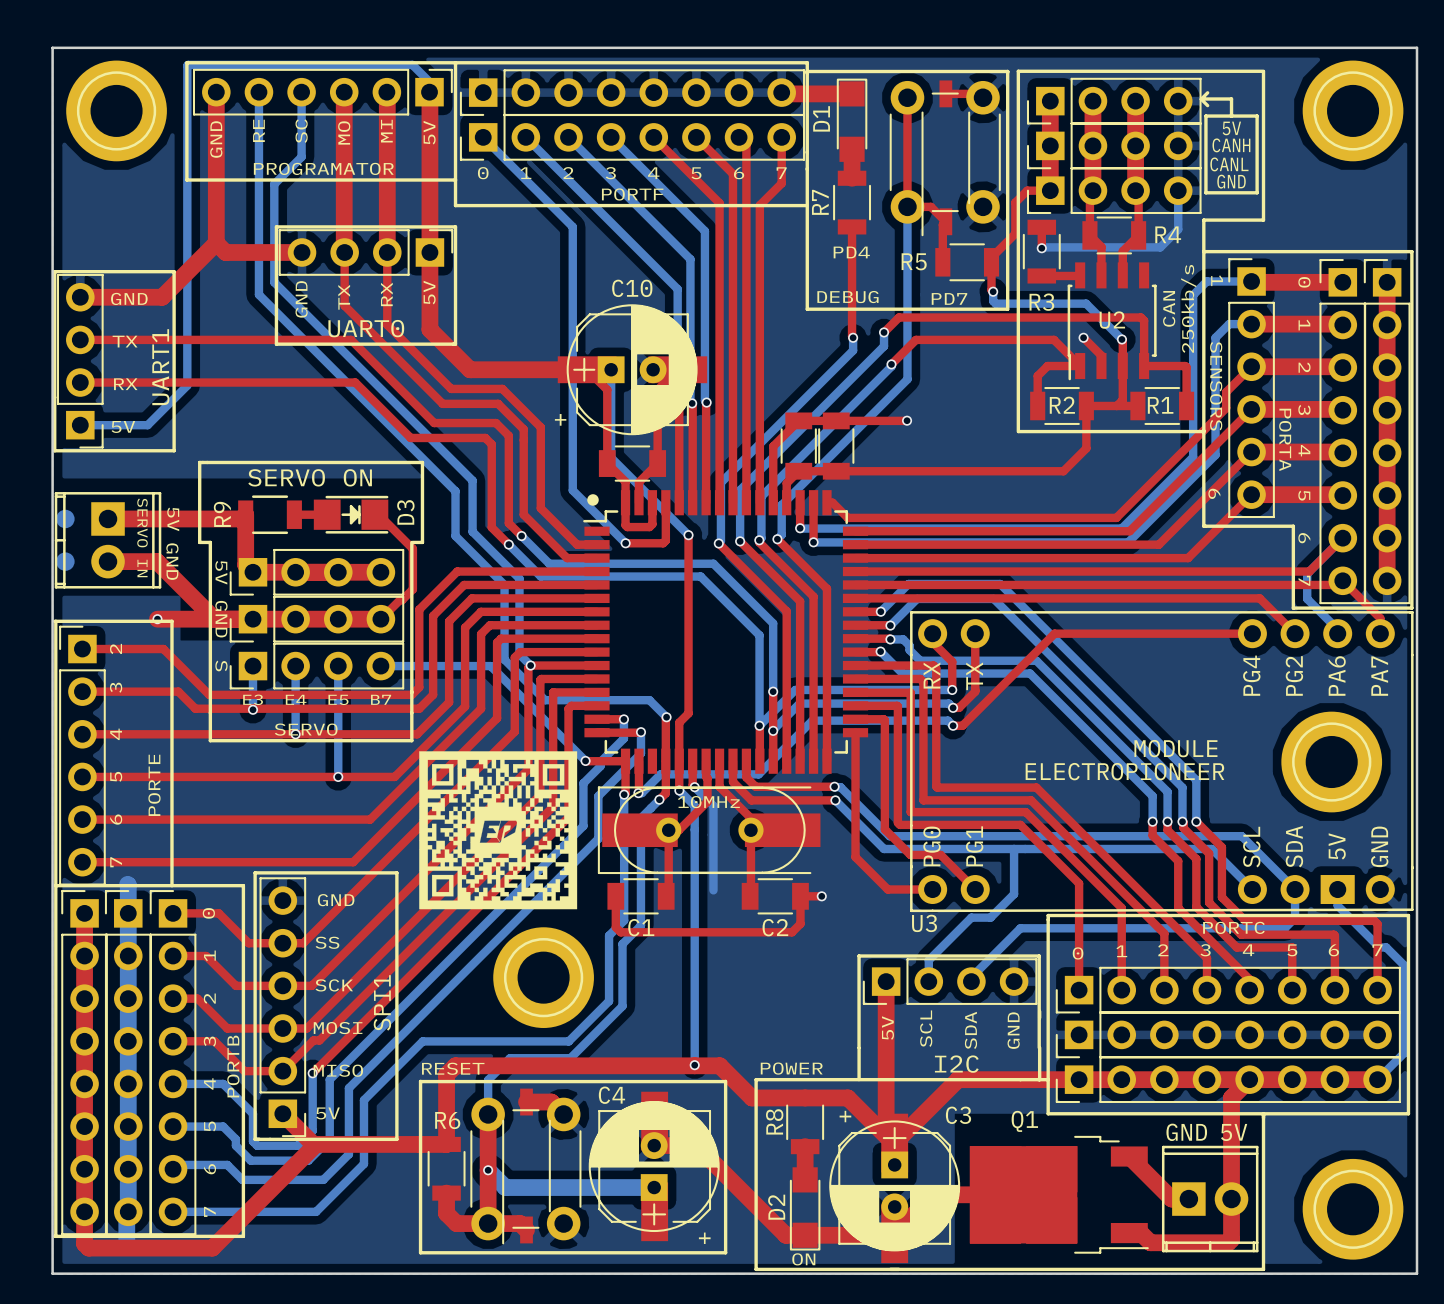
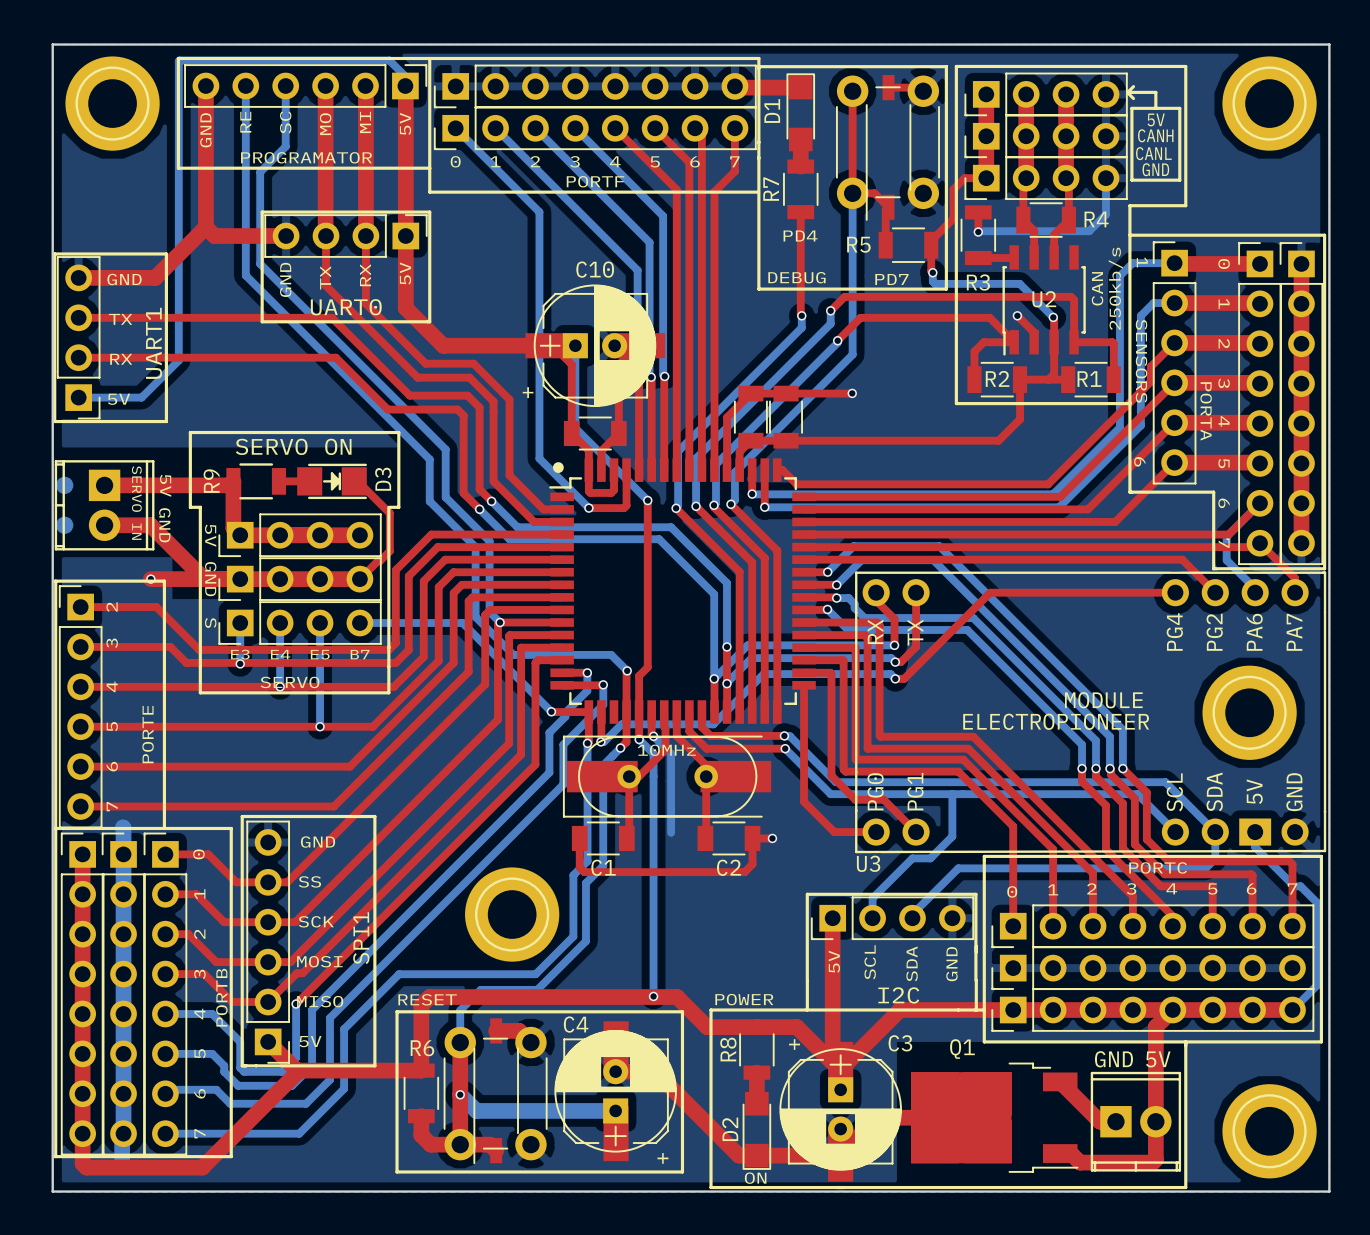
drawing: [419, 751, 578, 910] -> none

